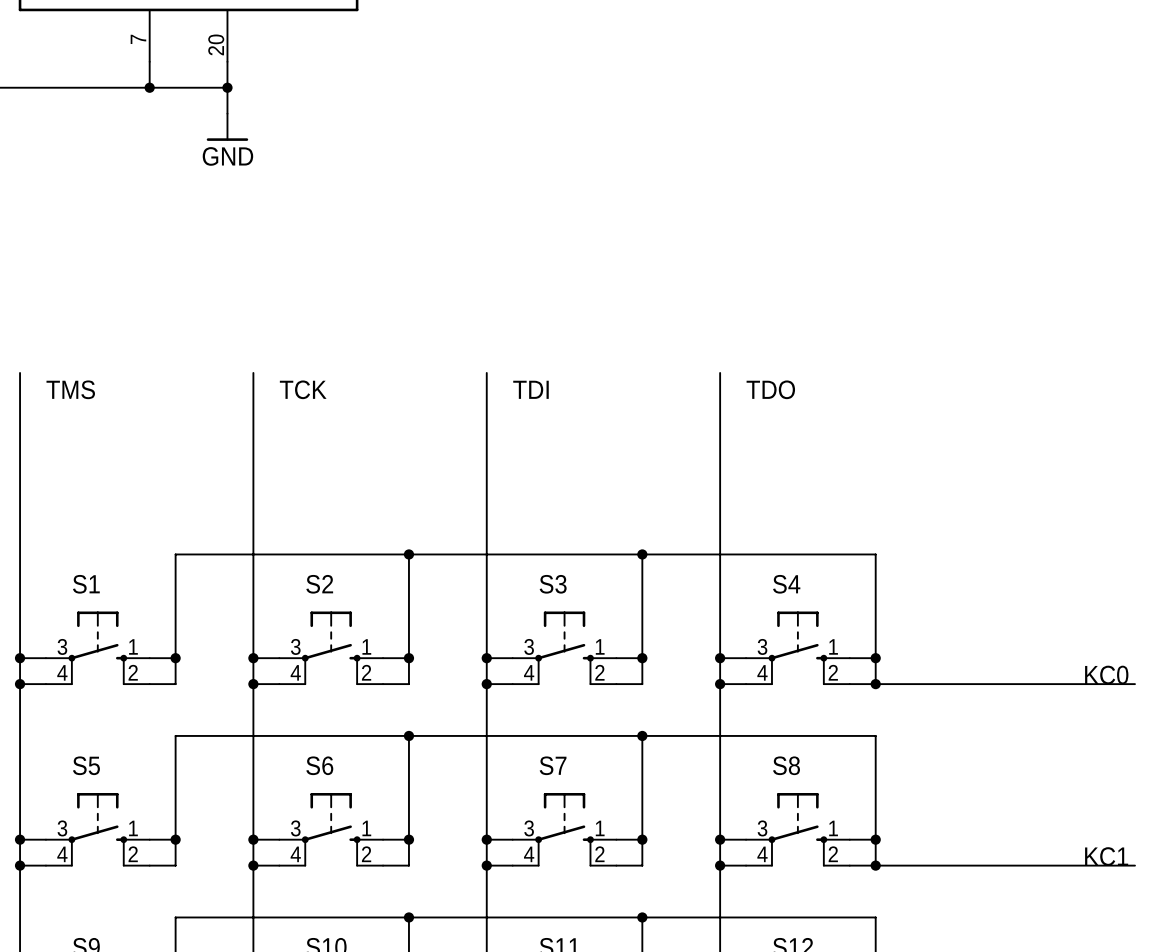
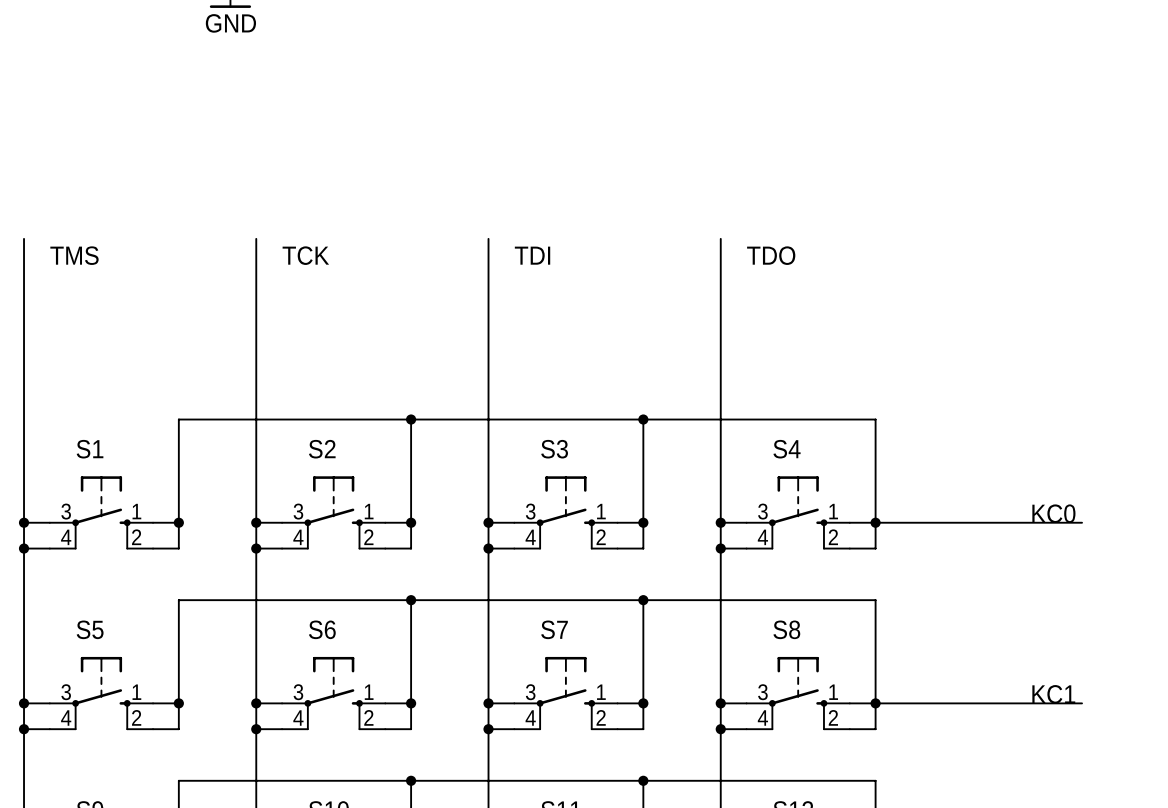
wire: none -> (875, 522) (1082, 522)
label position: KC0 (1106, 675) -> KC0 (1053, 513)
wire: (875, 684) (1134, 684) -> none
junction: (875, 684) -> none
wire: none -> (875, 703) (1082, 703)
label position: KC1 (1106, 856) -> KC1 (1053, 694)
wire: (875, 865) (1134, 865) -> none
junction: (875, 865) -> none

